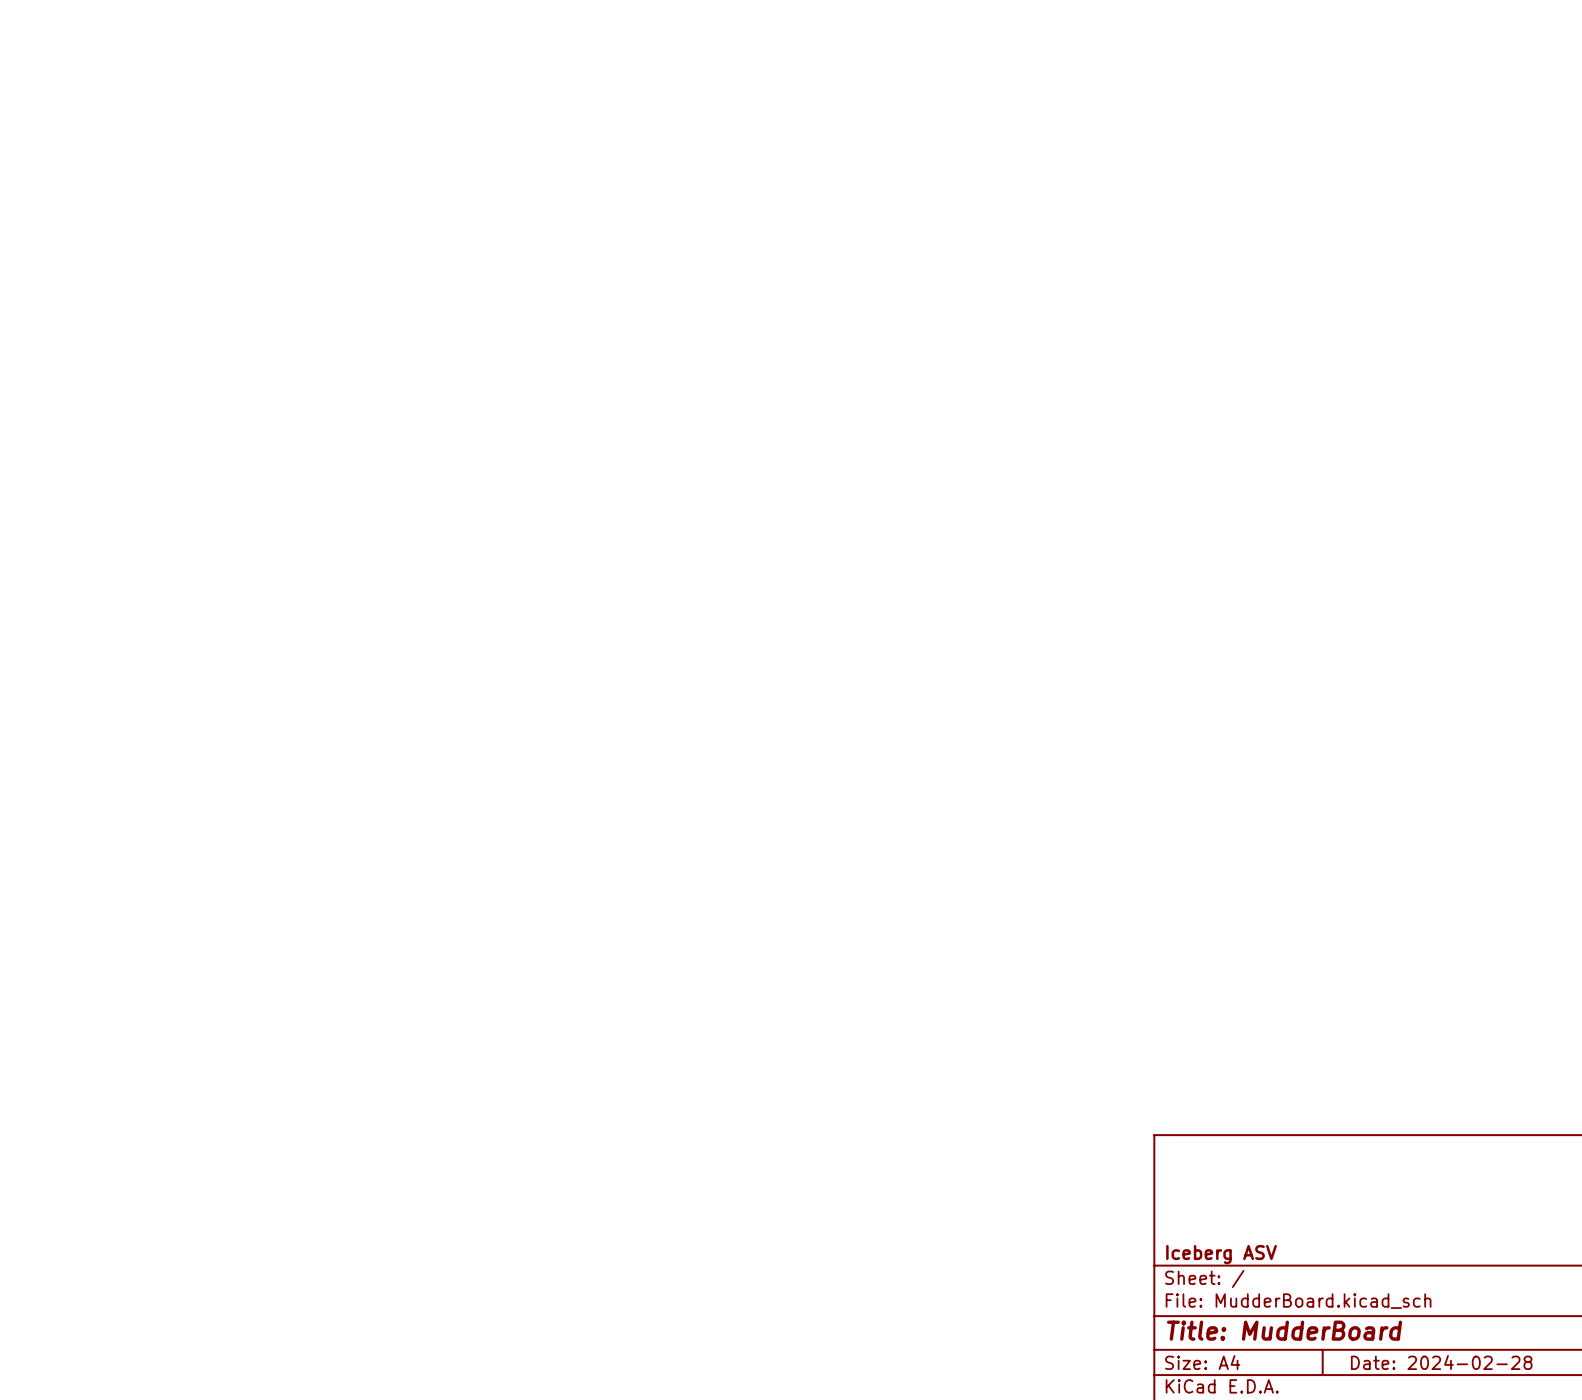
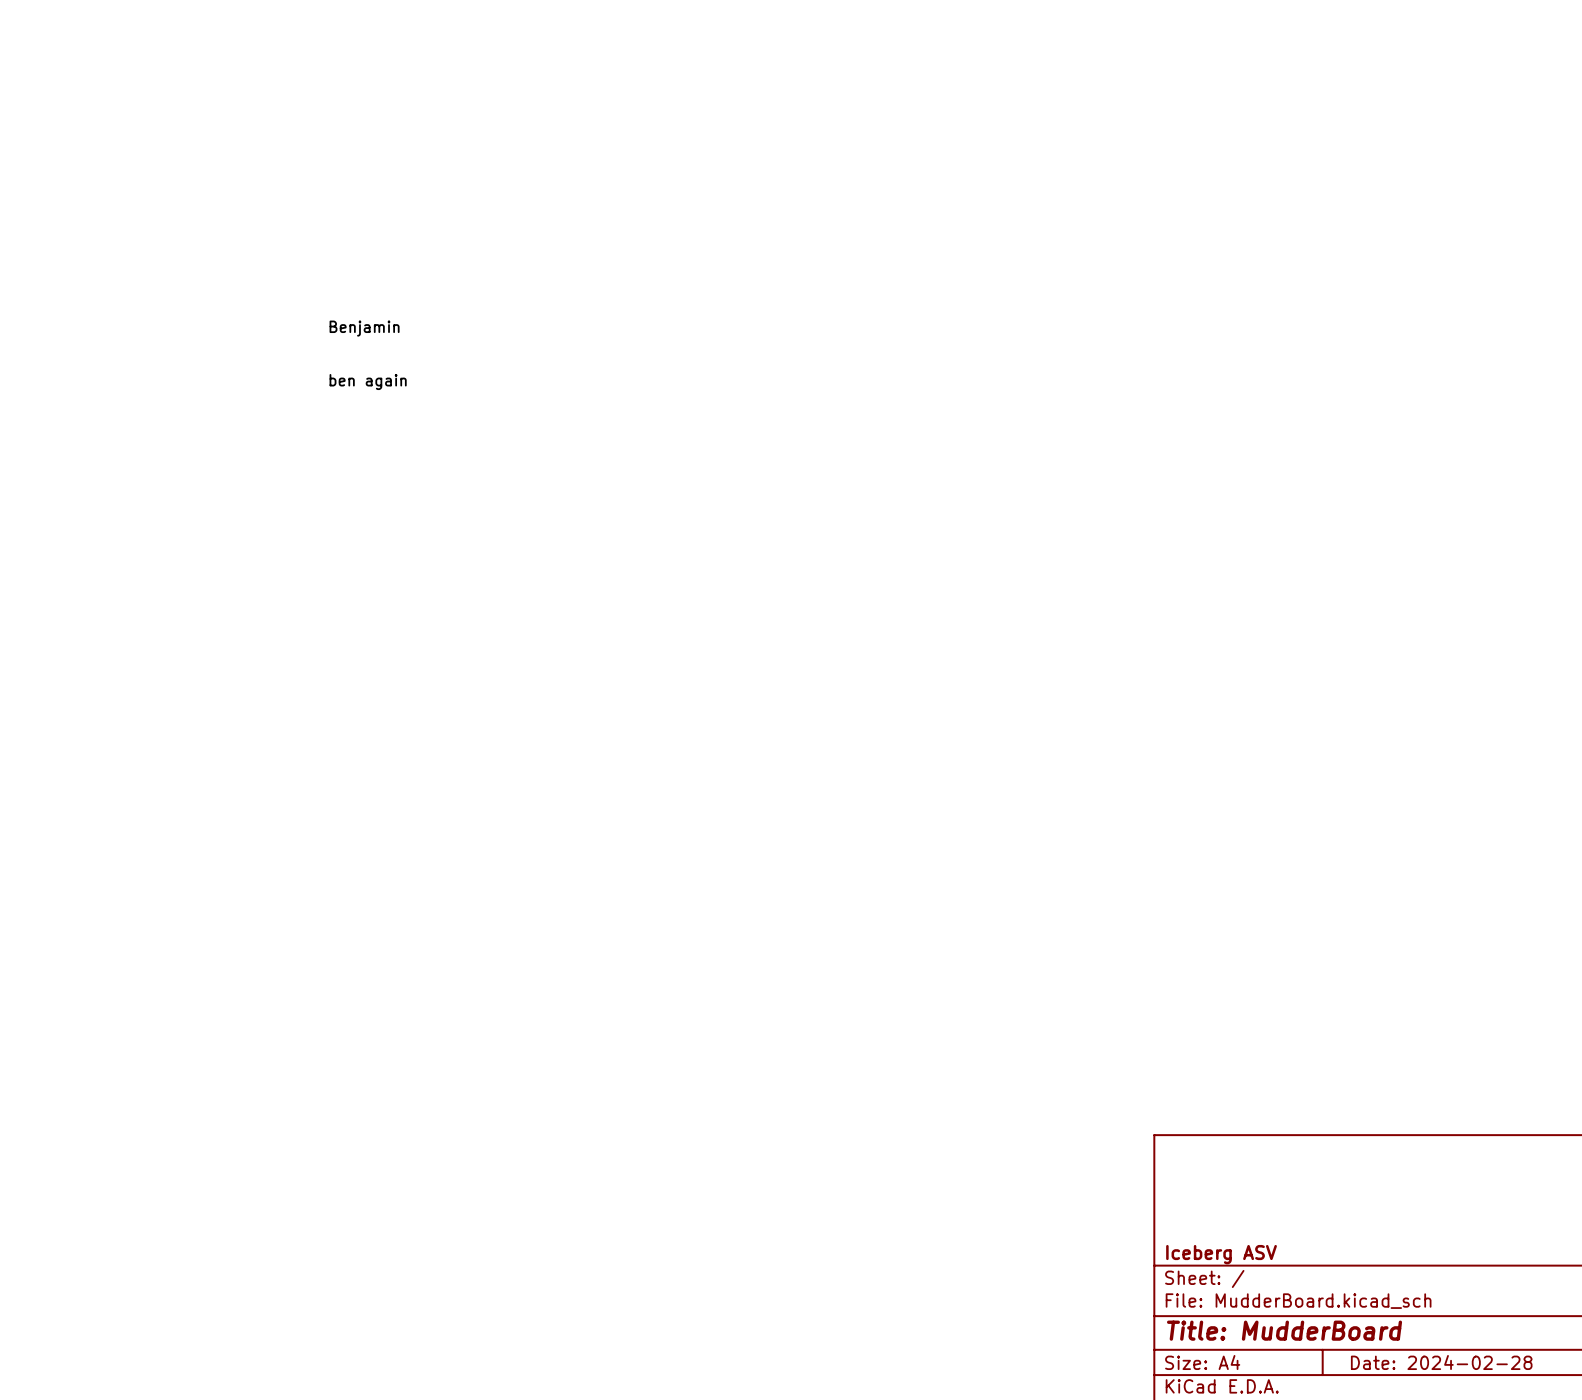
label: none -> Benjamin (364, 328)
label: none -> ben again (368, 382)

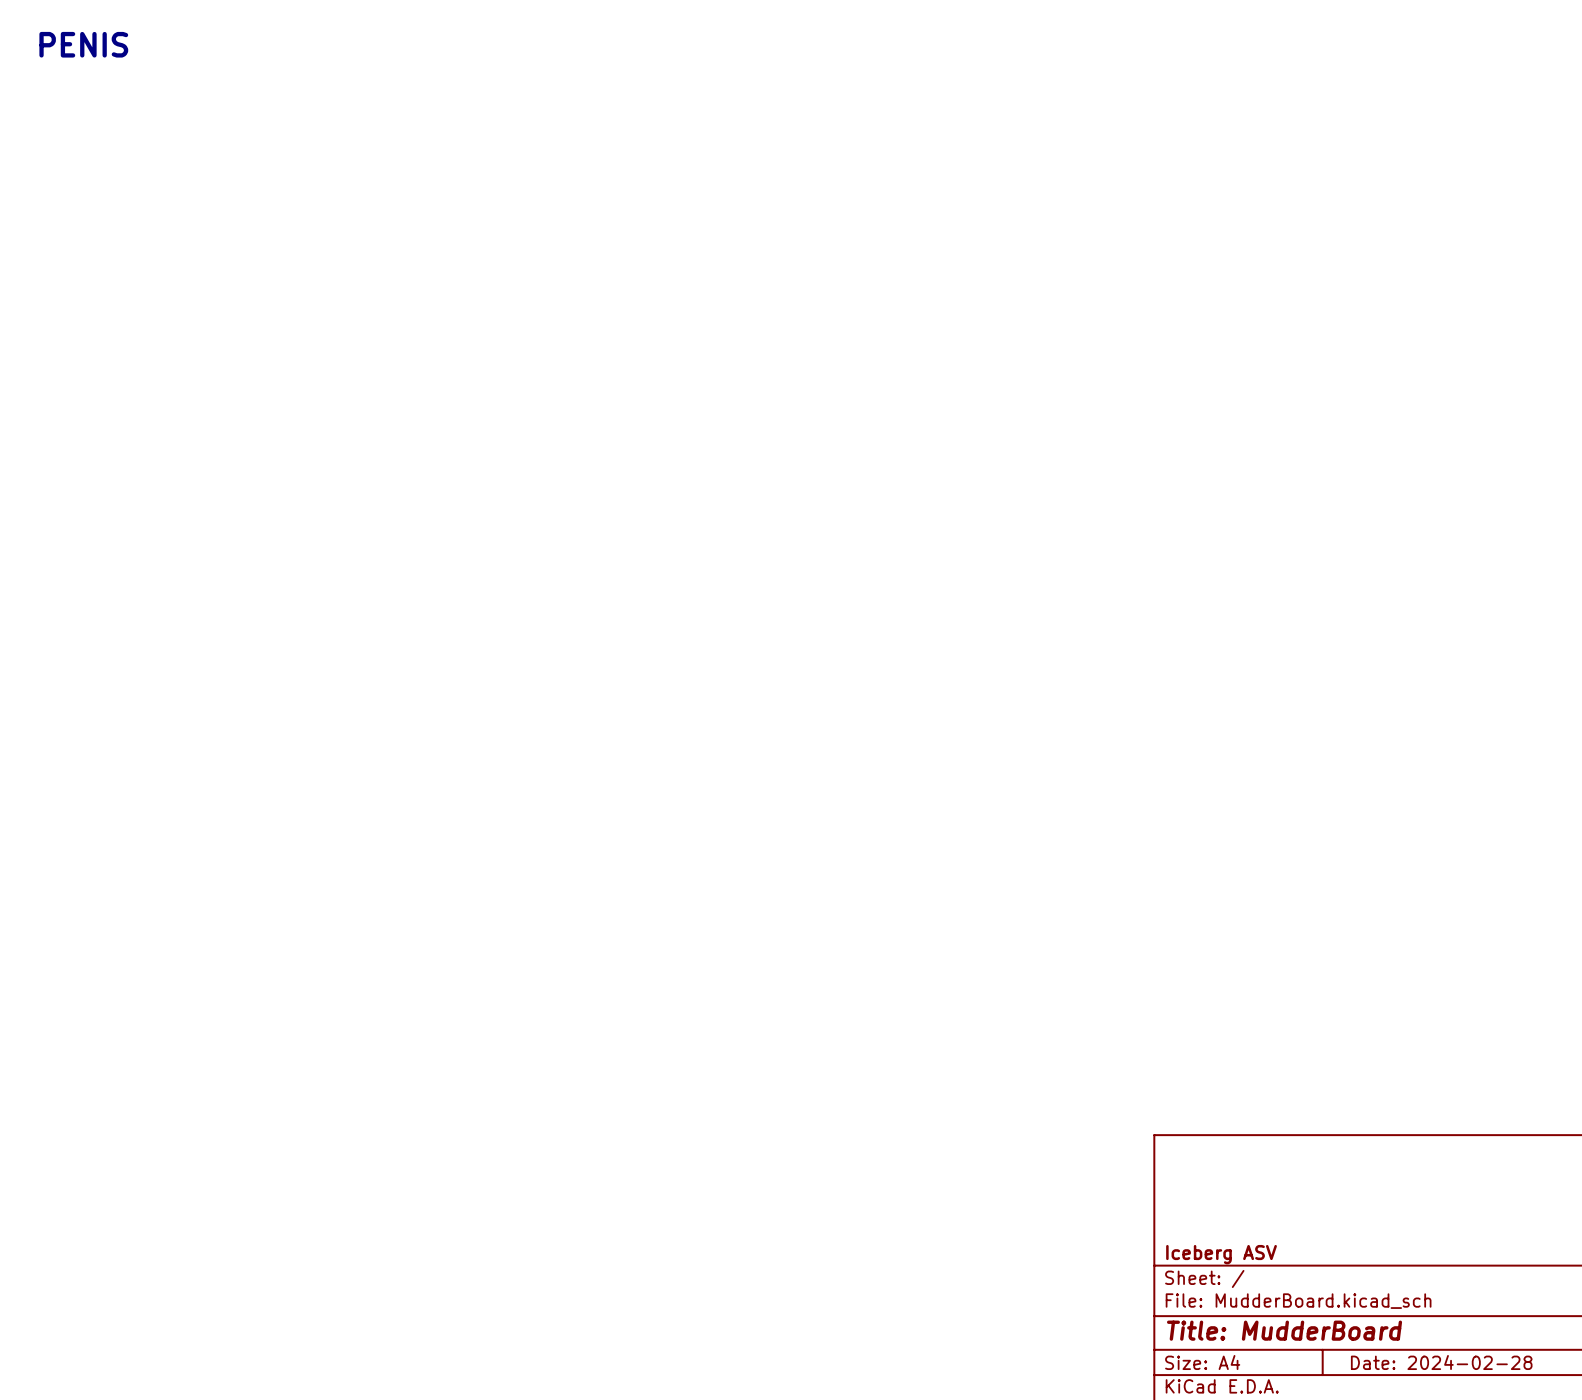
text: none -> PENIS (83, 44)
label: Benjamin (364, 328) -> none
label: ben again (368, 382) -> none

